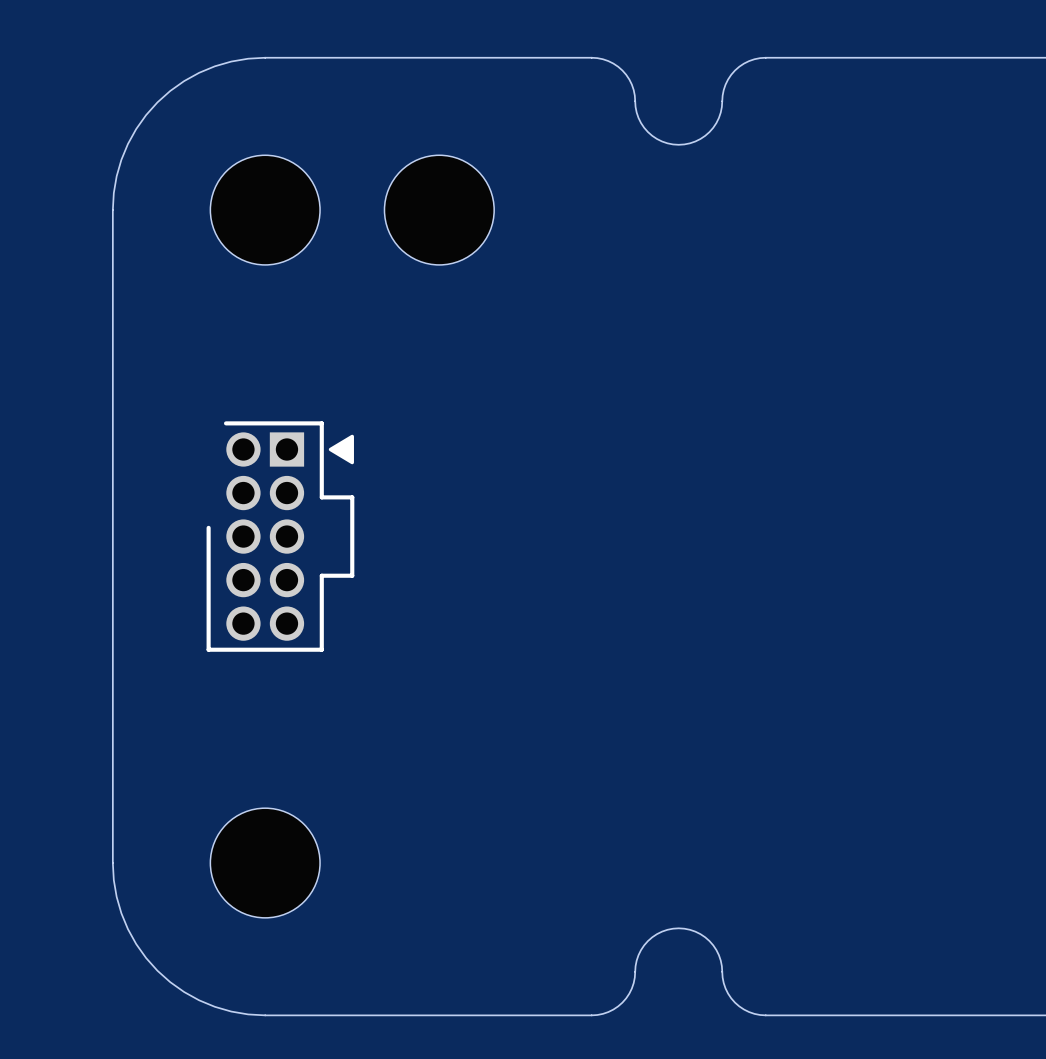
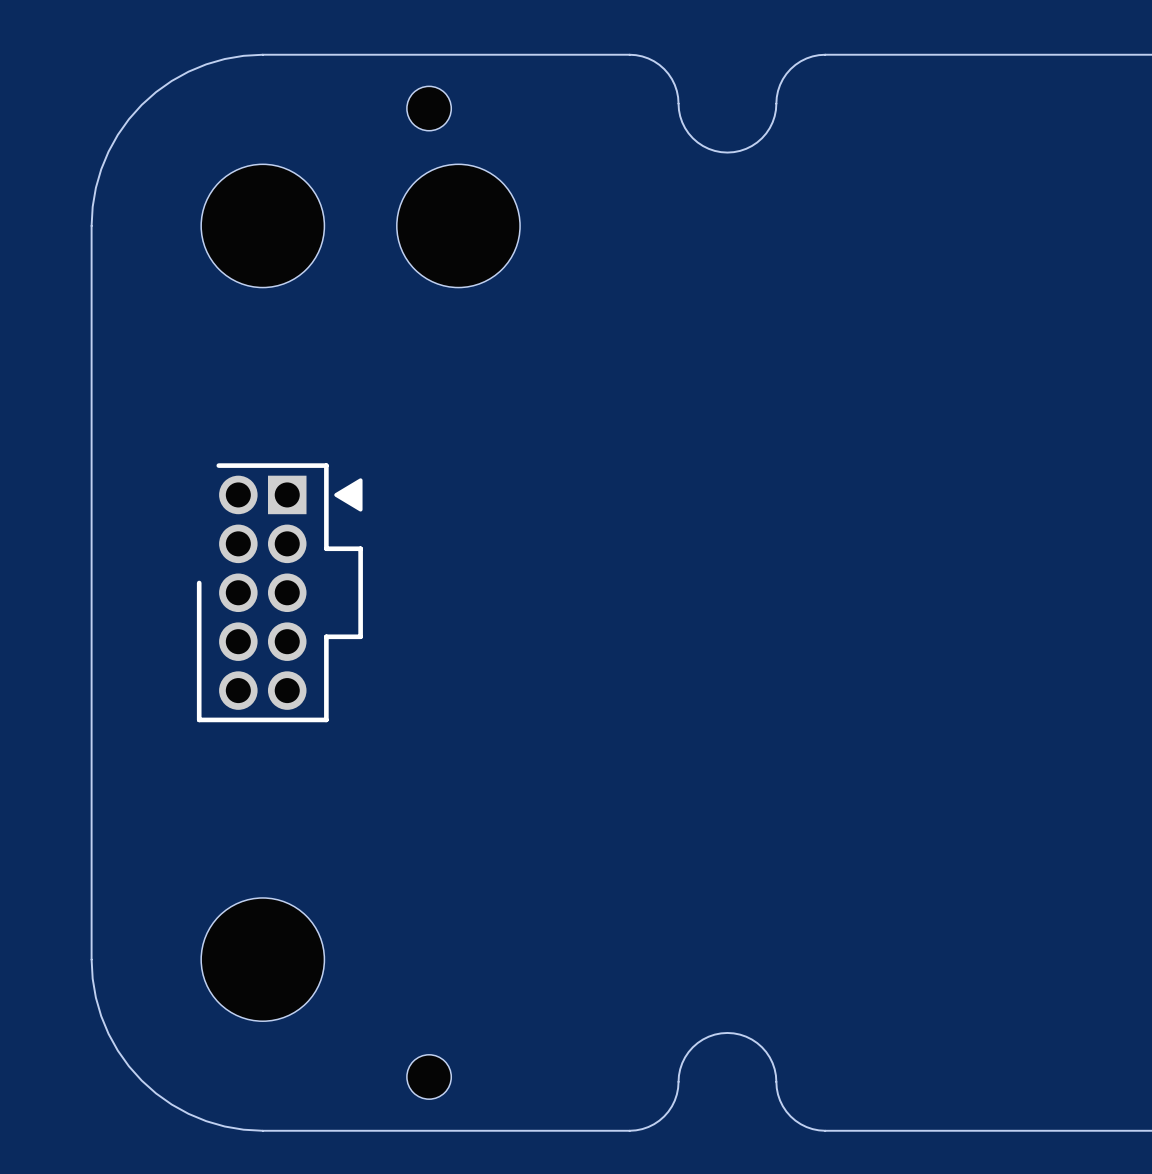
part: none -> (429, 108)
part: none -> (429, 1076)

